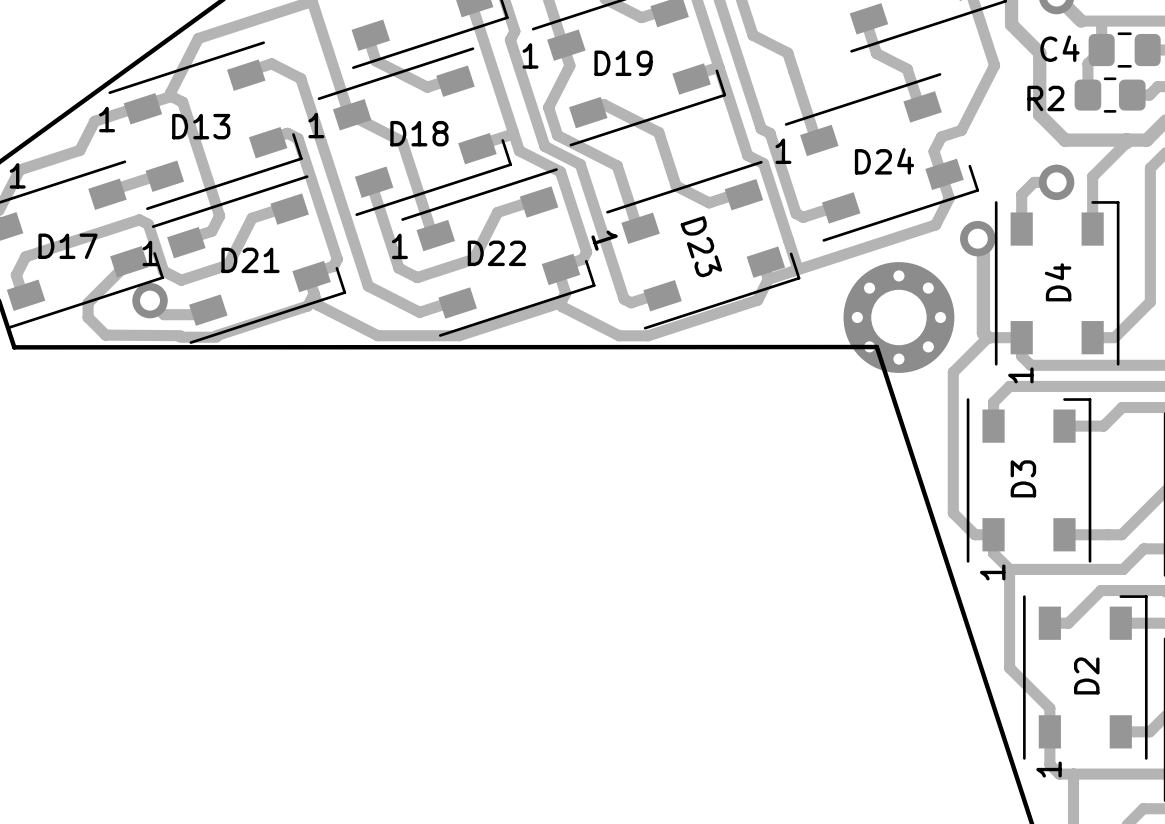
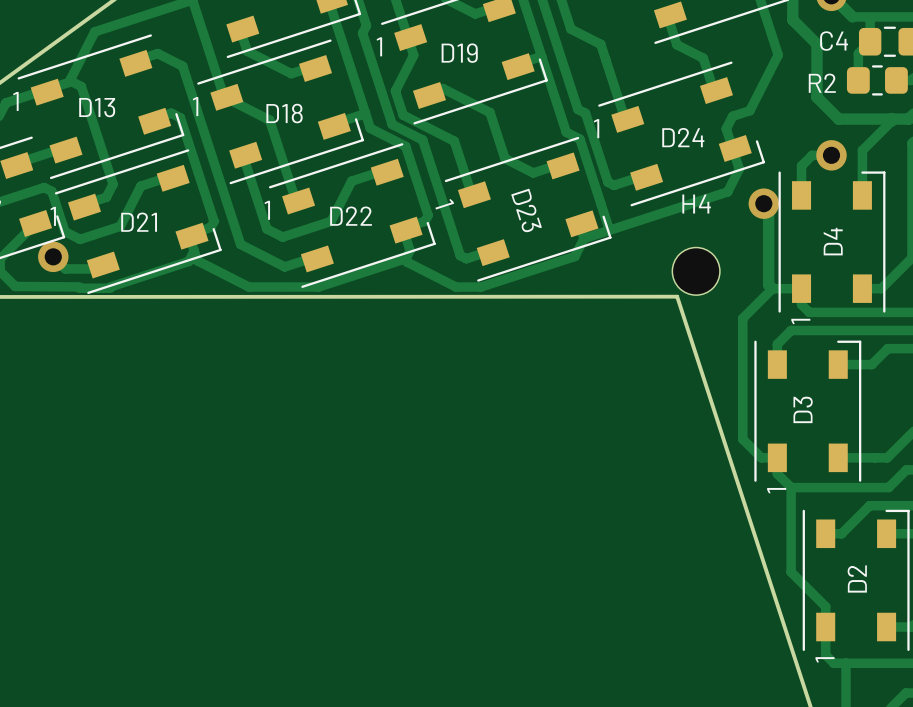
part: (898, 317) -> none
H4: none -> (696, 271)

